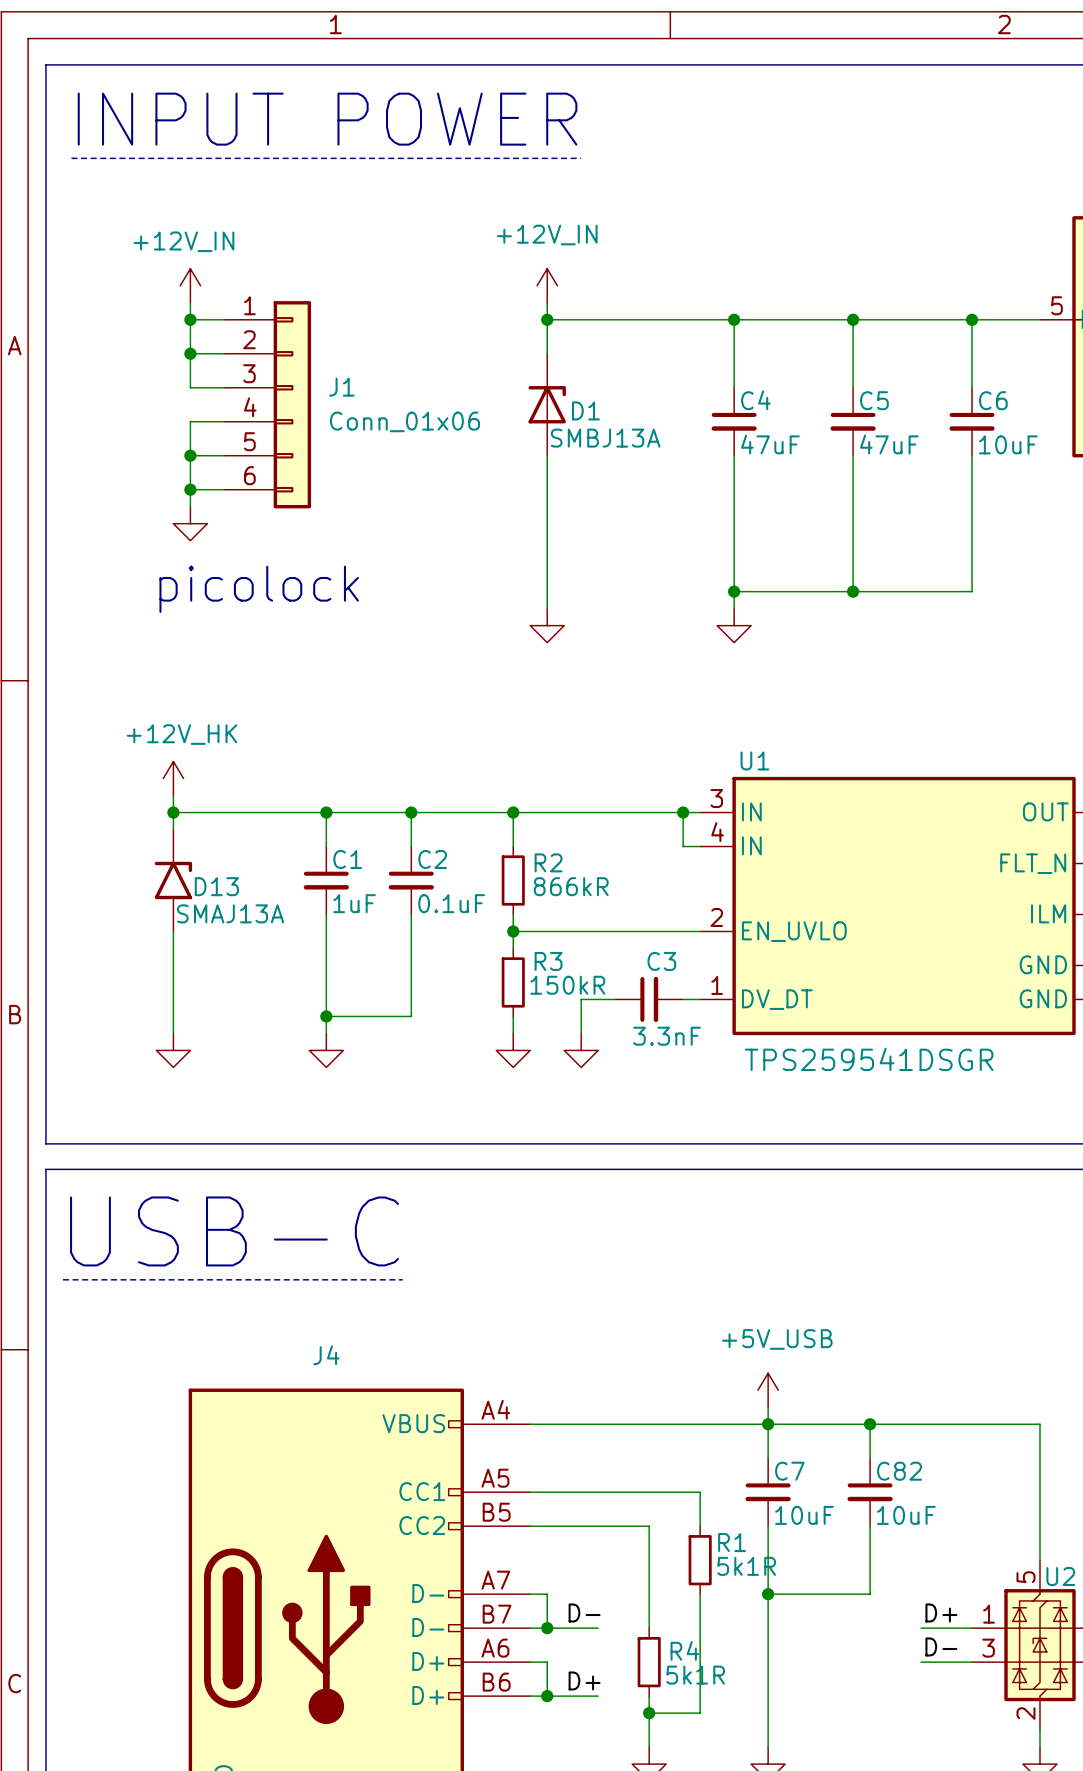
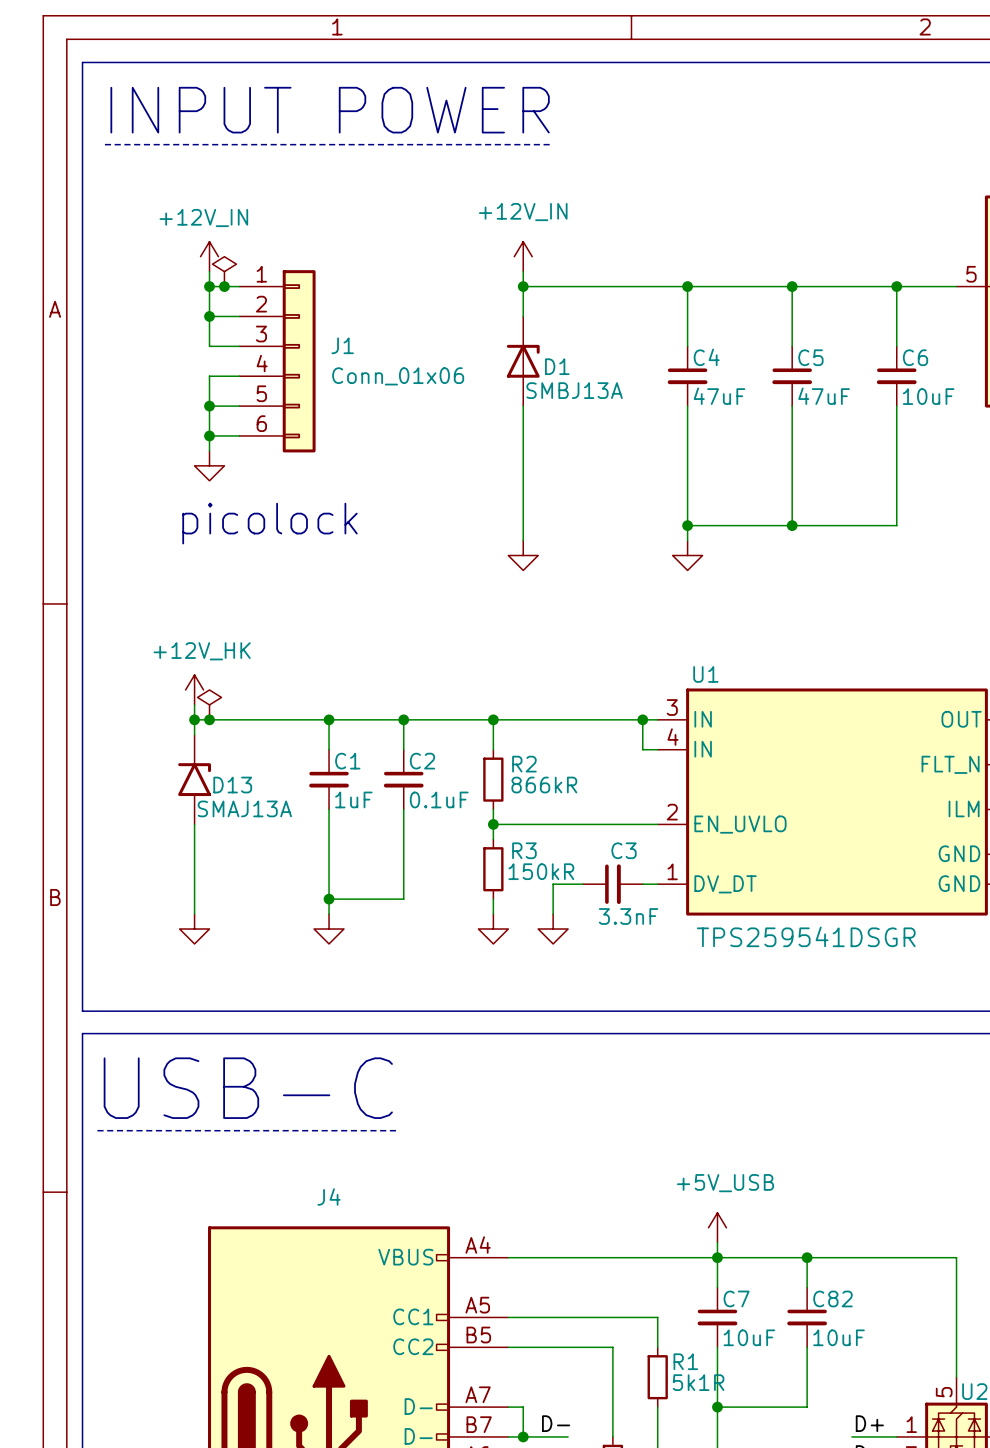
power symbol: none -> (224, 271)
junction: none -> (224, 286)
power symbol: none -> (209, 704)
junction: none -> (209, 719)

